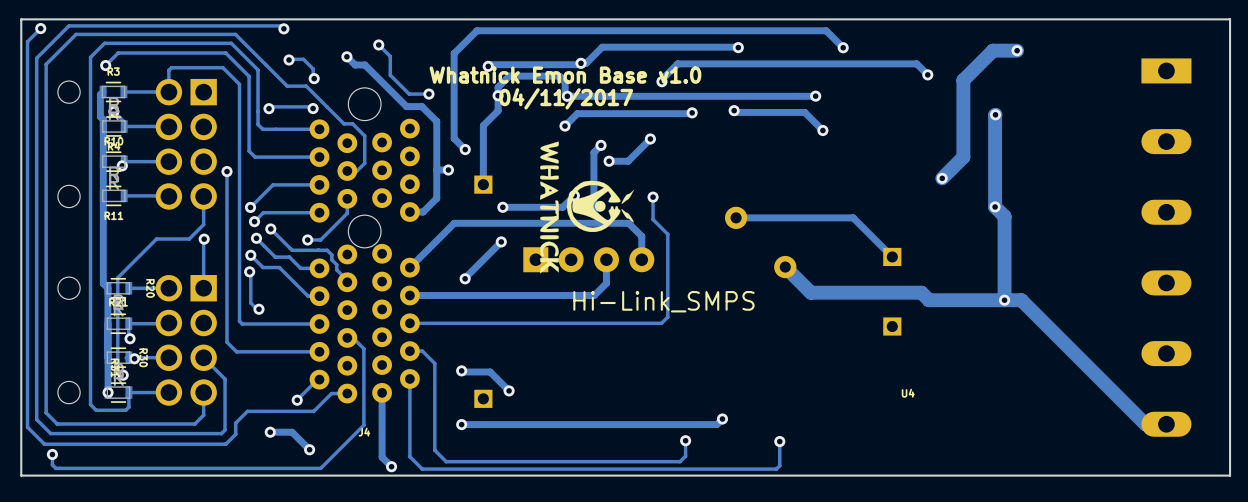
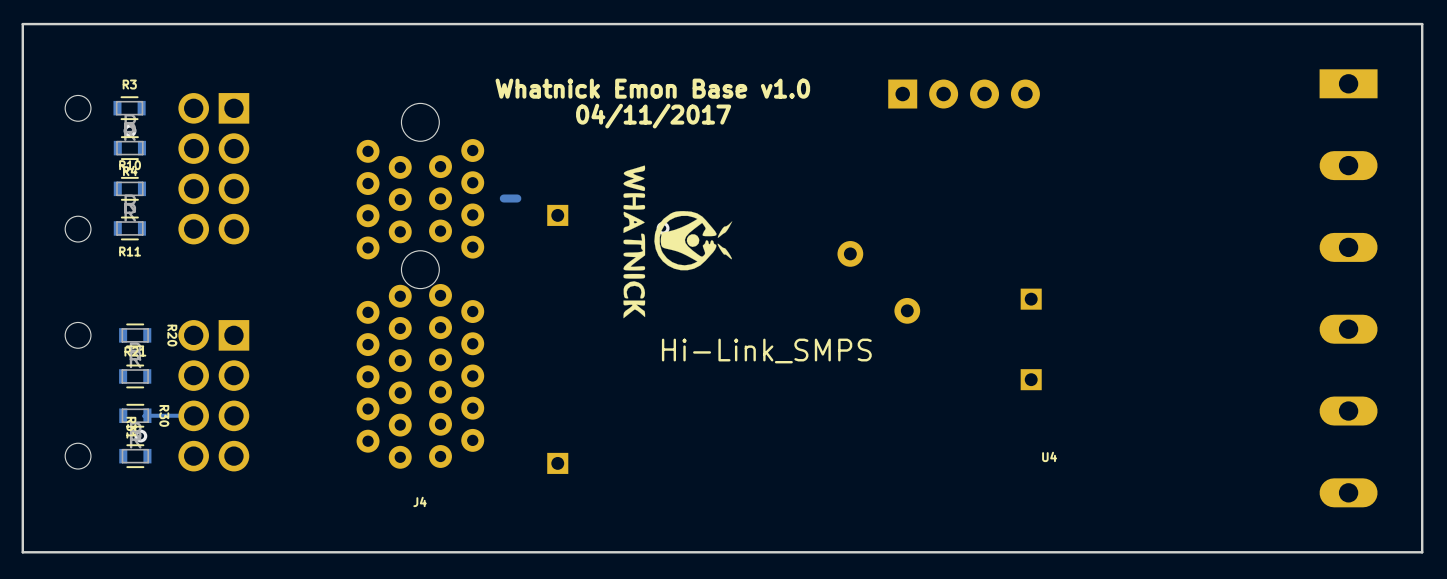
track: (40, 28) (27, 41) (27, 427) (44, 444) (225, 444) (235, 434) (235, 423) (247, 411) (313, 411) (331, 393) (347, 393) -> none
via: (40, 28) -> none
track: (283, 28) (280, 25) (68, 25) (36, 58) (36, 419) (50, 433) (221, 433) (225, 430) (225, 379) (203, 357) -> none
via: (283, 28) -> none
track: (378, 44) (390, 56) (390, 75) (409, 94) (428, 94) -> none
via: (378, 44) -> none
track: (738, 47) (602, 47) (586, 63) (579, 64) (489, 64) (488, 66) -> none
via: (738, 47) -> none
track: (843, 47) (826, 30) (476, 30) (454, 53) (454, 138) (465, 149) -> none
via: (843, 47) -> none
track: (1017, 50) (993, 50) (963, 80) (963, 157) (942, 178) -> none
via: (1017, 50) -> none
track: (346, 56) (355, 65) (364, 65) (406, 106) (421, 106) (436, 121) (436, 198) (423, 212) (409, 212) -> none
via: (346, 56) -> none
track: (289, 59) (303, 59) (313, 69) (314, 78) -> none
via: (289, 59) -> none
via: (581, 63) -> none
track: (105, 65) (118, 53) (225, 53) (249, 76) (249, 151) (255, 157) (319, 157) -> none
via: (105, 65) -> none
via: (488, 66) -> none
track: (927, 74) (916, 63) (677, 63) (661, 81) -> none
via: (927, 74) -> none
via: (314, 78) -> none
via: (661, 81) -> none
track: (103, 91) (100, 94) (100, 116) (103, 119) (103, 283) (107, 288) (107, 357) -> none
track: (168, 91) (123, 91) -> none
track: (168, 92) (168, 70) (171, 67) (222, 67) (239, 84) (239, 321) (242, 324) (319, 324) -> none
via: (428, 94) -> none
via: (498, 95) -> none
via: (567, 96) -> none
track: (815, 96) (567, 96) (565, 94) (565, 81) (559, 76) (509, 76) (498, 87) (498, 110) (483, 125) (483, 184) -> none
via: (815, 96) -> none
via: (269, 108) -> none
track: (270, 108) (271, 106) (311, 106) (313, 108) -> none
via: (313, 108) -> none
track: (734, 110) (736, 112) (804, 112) (822, 130) -> none
via: (734, 110) -> none
track: (113, 111) (124, 121) (124, 126) (168, 126) -> none
track: (692, 112) (577, 113) (565, 126) -> none
via: (692, 112) -> none
track: (995, 114) (995, 206) (1004, 216) (1004, 300) -> none
via: (995, 114) -> none
via: (565, 126) -> none
track: (319, 129) (262, 129) (258, 124) (258, 70) (231, 43) (104, 43) (90, 57) (90, 404) (96, 410) (125, 410) (128, 407) (128, 392) (168, 392) -> none
via: (822, 130) -> none
track: (650, 139) (628, 161) (609, 161) -> none
via: (650, 139) -> none
track: (601, 145) (593, 152) (593, 213) (603, 223) -> none
via: (601, 145) -> none
via: (465, 149) -> none
track: (168, 161) (124, 161) (122, 165) -> none
via: (609, 161) -> none
via: (122, 165) -> none
track: (347, 170) (357, 170) (364, 163) (364, 135) (352, 123) (343, 123) (306, 86) (287, 86) (235, 34) (76, 34) (46, 64) (46, 412) (57, 424) (194, 424) (203, 415) (203, 392) -> none
via: (448, 170) -> none
track: (226, 171) (226, 342) (236, 351) (319, 351) -> none
via: (226, 171) -> none
via: (942, 178) -> none
track: (319, 184) (273, 184) (250, 207) -> none
track: (124, 195) (168, 196) -> none
track: (574, 195) (562, 207) (502, 207) -> none
track: (203, 196) (203, 224) (189, 239) (156, 239) (117, 277) (117, 369) (123, 375) -> none
track: (653, 197) (653, 219) (667, 234) (667, 317) (661, 323) (409, 323) -> none
via: (653, 197) -> none
track: (347, 198) (347, 213) (320, 239) (307, 239) -> none
via: (995, 206) -> none
via: (250, 207) -> none
via: (502, 207) -> none
track: (319, 212) (263, 212) (254, 221) -> none
track: (736, 217) (853, 217) (892, 256) -> none
via: (254, 221) -> none
track: (270, 228) (292, 250) (327, 250) (336, 264) (336, 269) (347, 282) -> none
via: (270, 228) -> none
track: (256, 238) (275, 257) (289, 257) (300, 268) (319, 268) -> none
via: (256, 238) -> none
track: (204, 239) (203, 288) -> none
via: (204, 239) -> none
via: (307, 239) -> none
track: (501, 241) (465, 278) -> none
via: (501, 241) -> none
track: (250, 255) (263, 267) (279, 267) (308, 296) (319, 296) -> none
via: (250, 255) -> none
part position: (588, 259) -> (964, 94)
track: (606, 259) (606, 283) (594, 295) (409, 295) -> none
track: (641, 259) (641, 236) (628, 223) (454, 223) (409, 267) -> none
track: (785, 267) (810, 292) (921, 292) (929, 300) (1021, 300) (1145, 424) (1166, 424) -> none
track: (249, 271) (250, 303) (258, 309) -> none
via: (249, 271) -> none
via: (465, 278) -> none
track: (168, 288) (128, 288) -> none
via: (1004, 300) -> none
via: (258, 309) -> none
track: (168, 323) (128, 323) (130, 338) -> none
track: (347, 337) (353, 337) (363, 348) (363, 425) (320, 468) (55, 468) (52, 464) (52, 454) -> none
via: (130, 338) -> none
track: (409, 351) (422, 351) (434, 363) (434, 450) (446, 461) (680, 461) (685, 456) (685, 440) -> none
track: (107, 357) (108, 392) -> none
via: (134, 358) -> none
track: (461, 370) (490, 371) (509, 390) -> none
via: (461, 370) -> none
track: (409, 378) (409, 456) (422, 469) (776, 469) (779, 465) (779, 441) -> none
track: (319, 379) (297, 399) -> none
via: (509, 390) -> none
via: (108, 392) -> none
track: (382, 392) (382, 457) (391, 466) -> none
via: (297, 400) -> none
track: (722, 419) (716, 424) (461, 424) -> none
via: (722, 419) -> none
via: (461, 424) -> none
track: (270, 432) (292, 432) (309, 449) -> none
via: (270, 432) -> none
via: (685, 440) -> none
via: (779, 441) -> none
via: (309, 449) -> none
via: (52, 454) -> none
via: (391, 466) -> none

